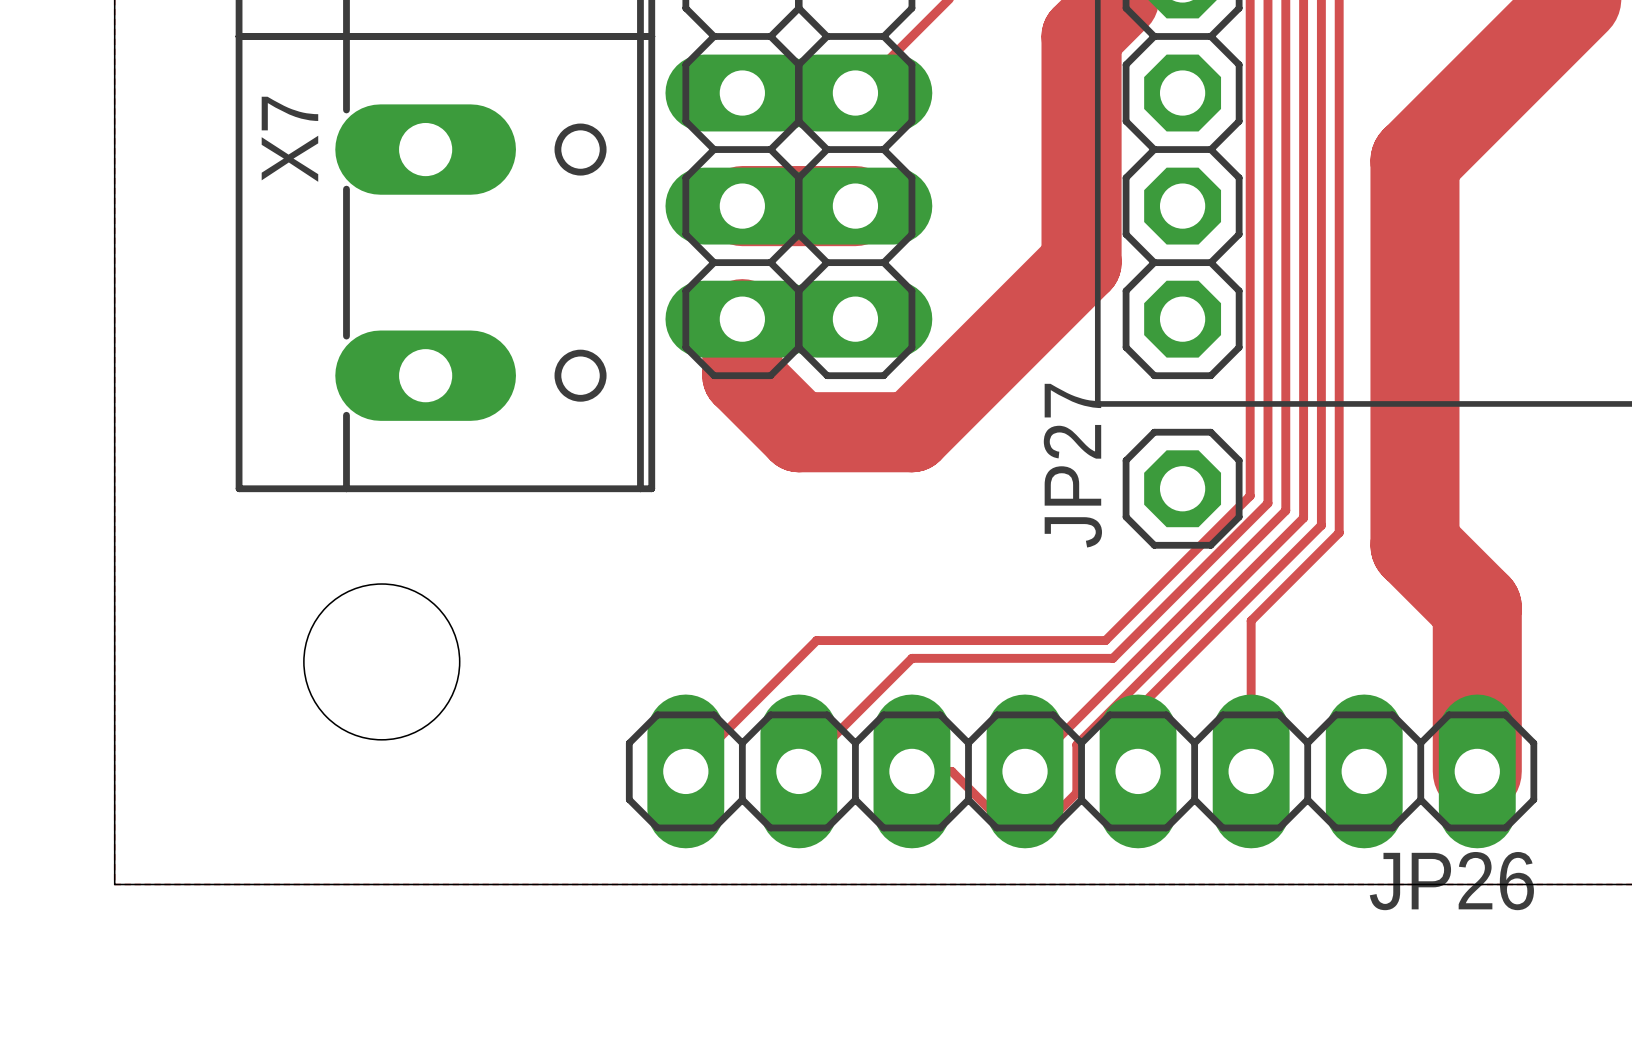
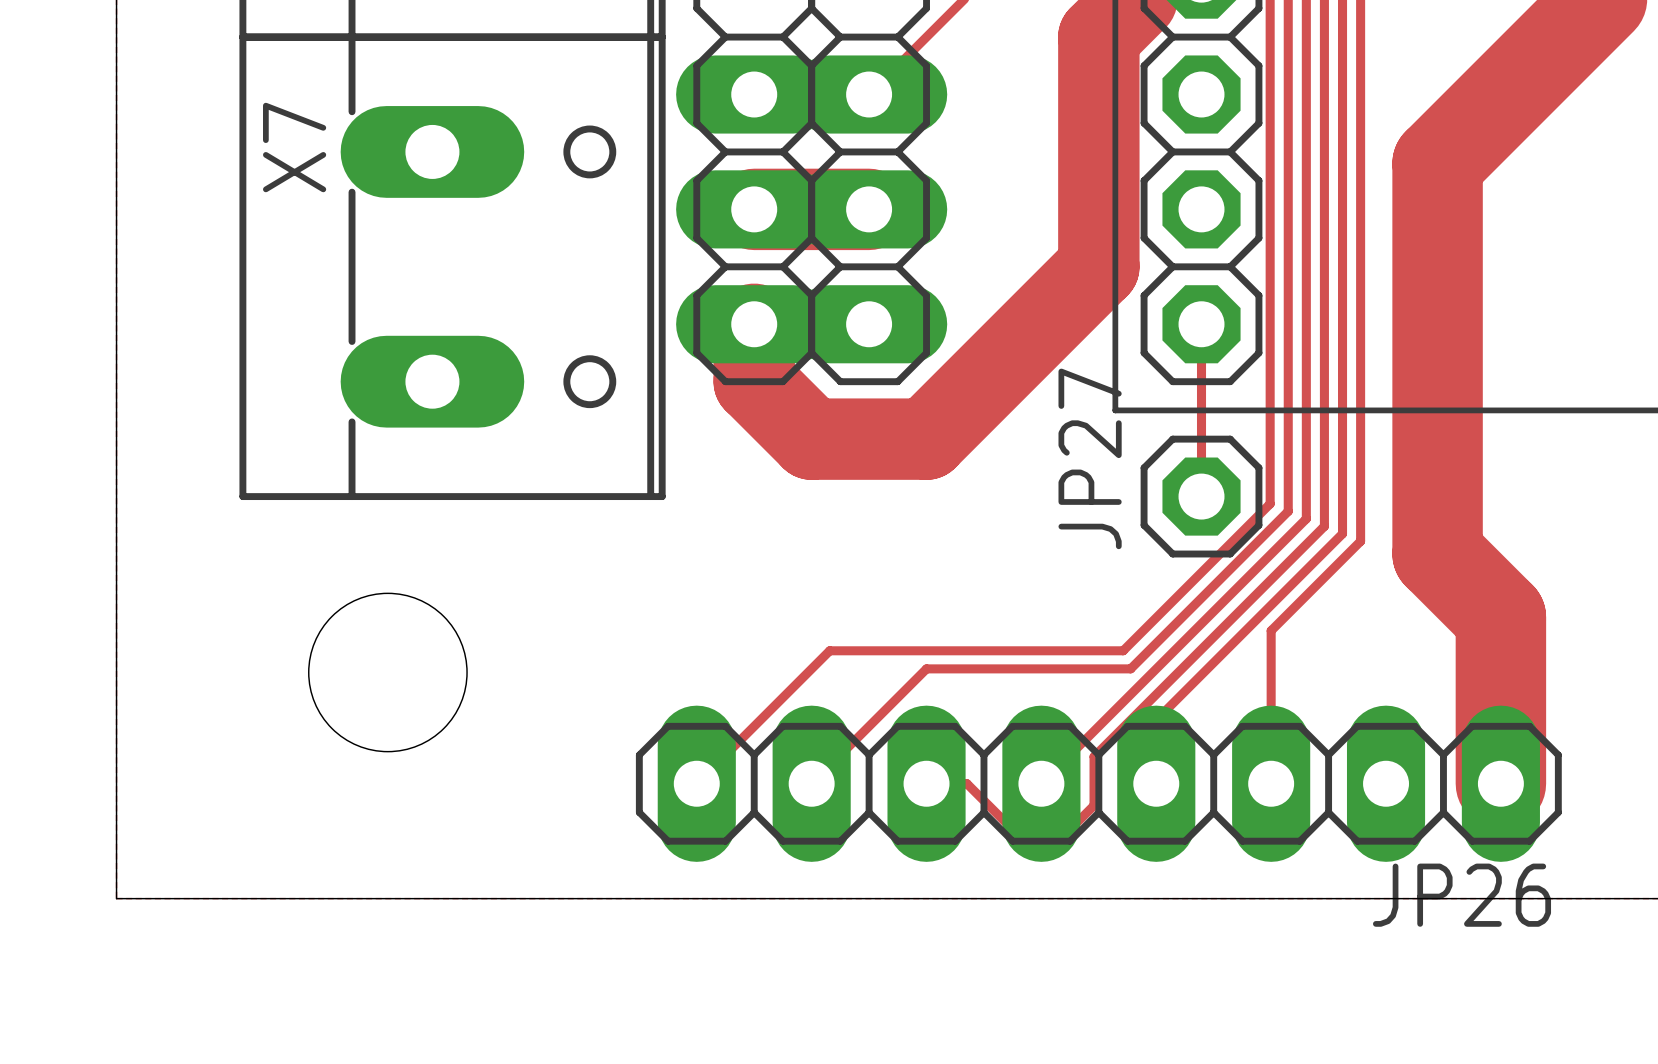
track: none -> (1201, 324) (1201, 496)

